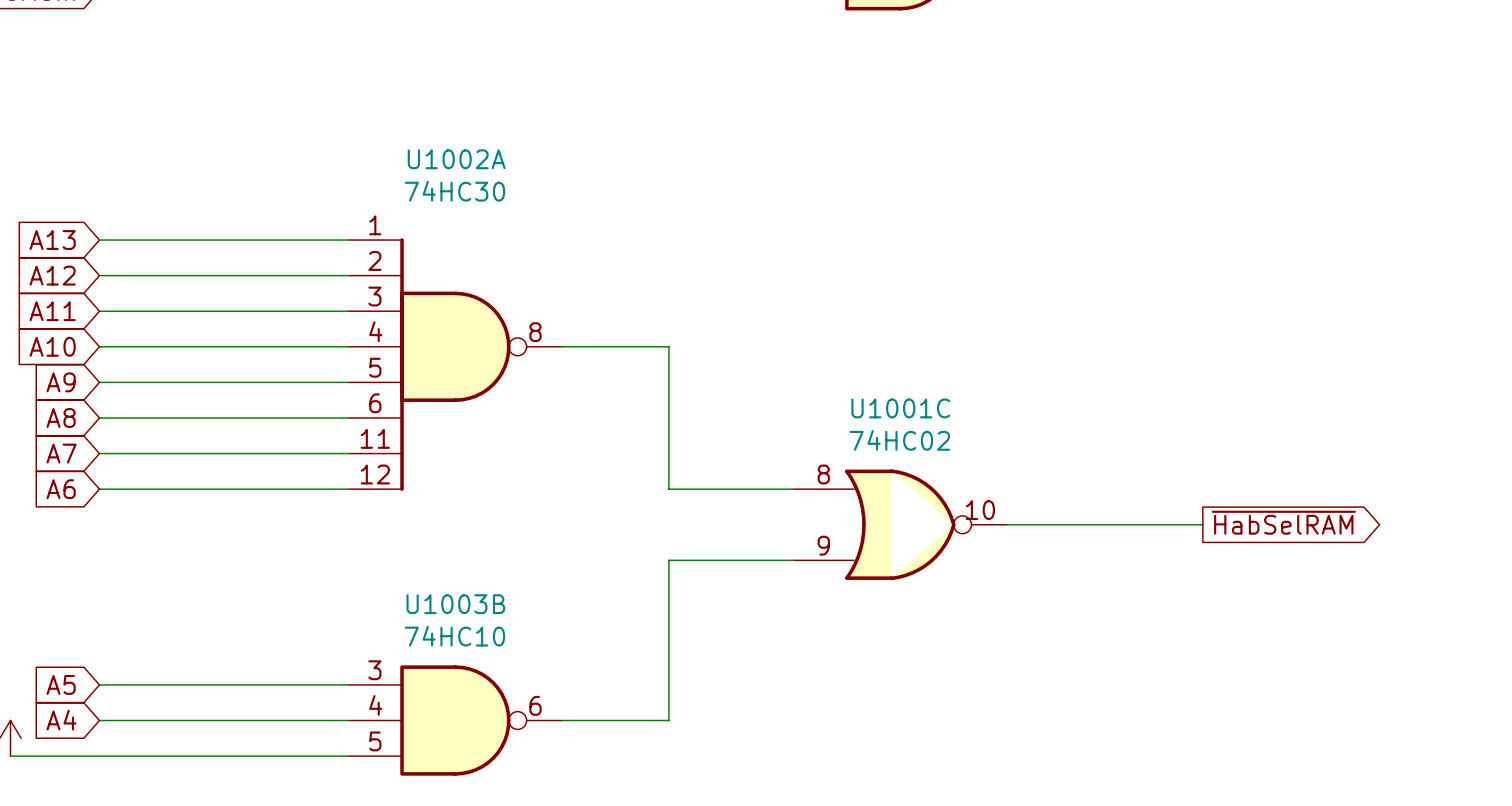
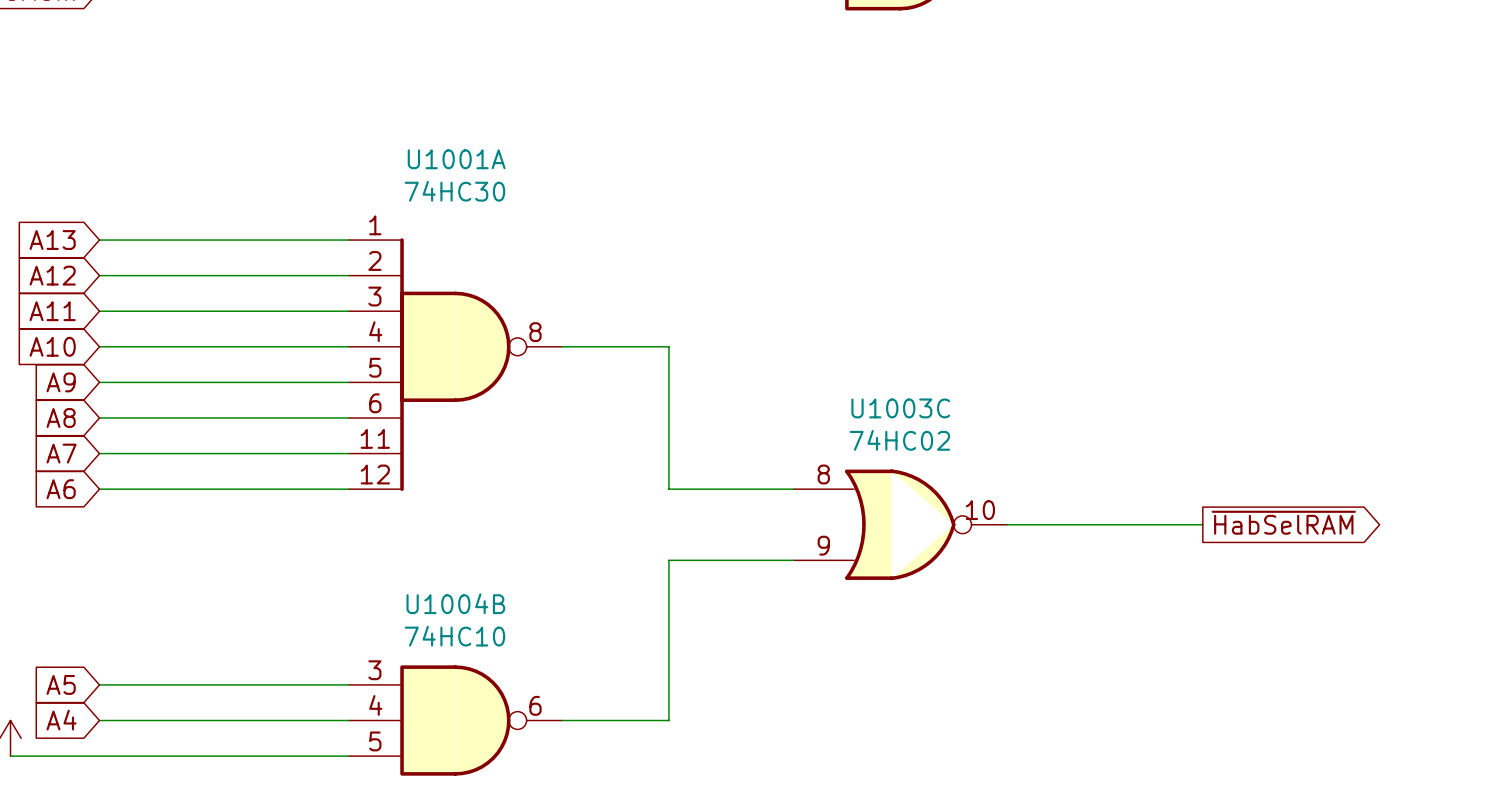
U1002A name: U1002A (456, 159) -> U1001A (456, 159)
U1001C name: U1001C (900, 408) -> U1003C (900, 408)
U1003B name: U1003B (455, 604) -> U1004B (455, 603)

